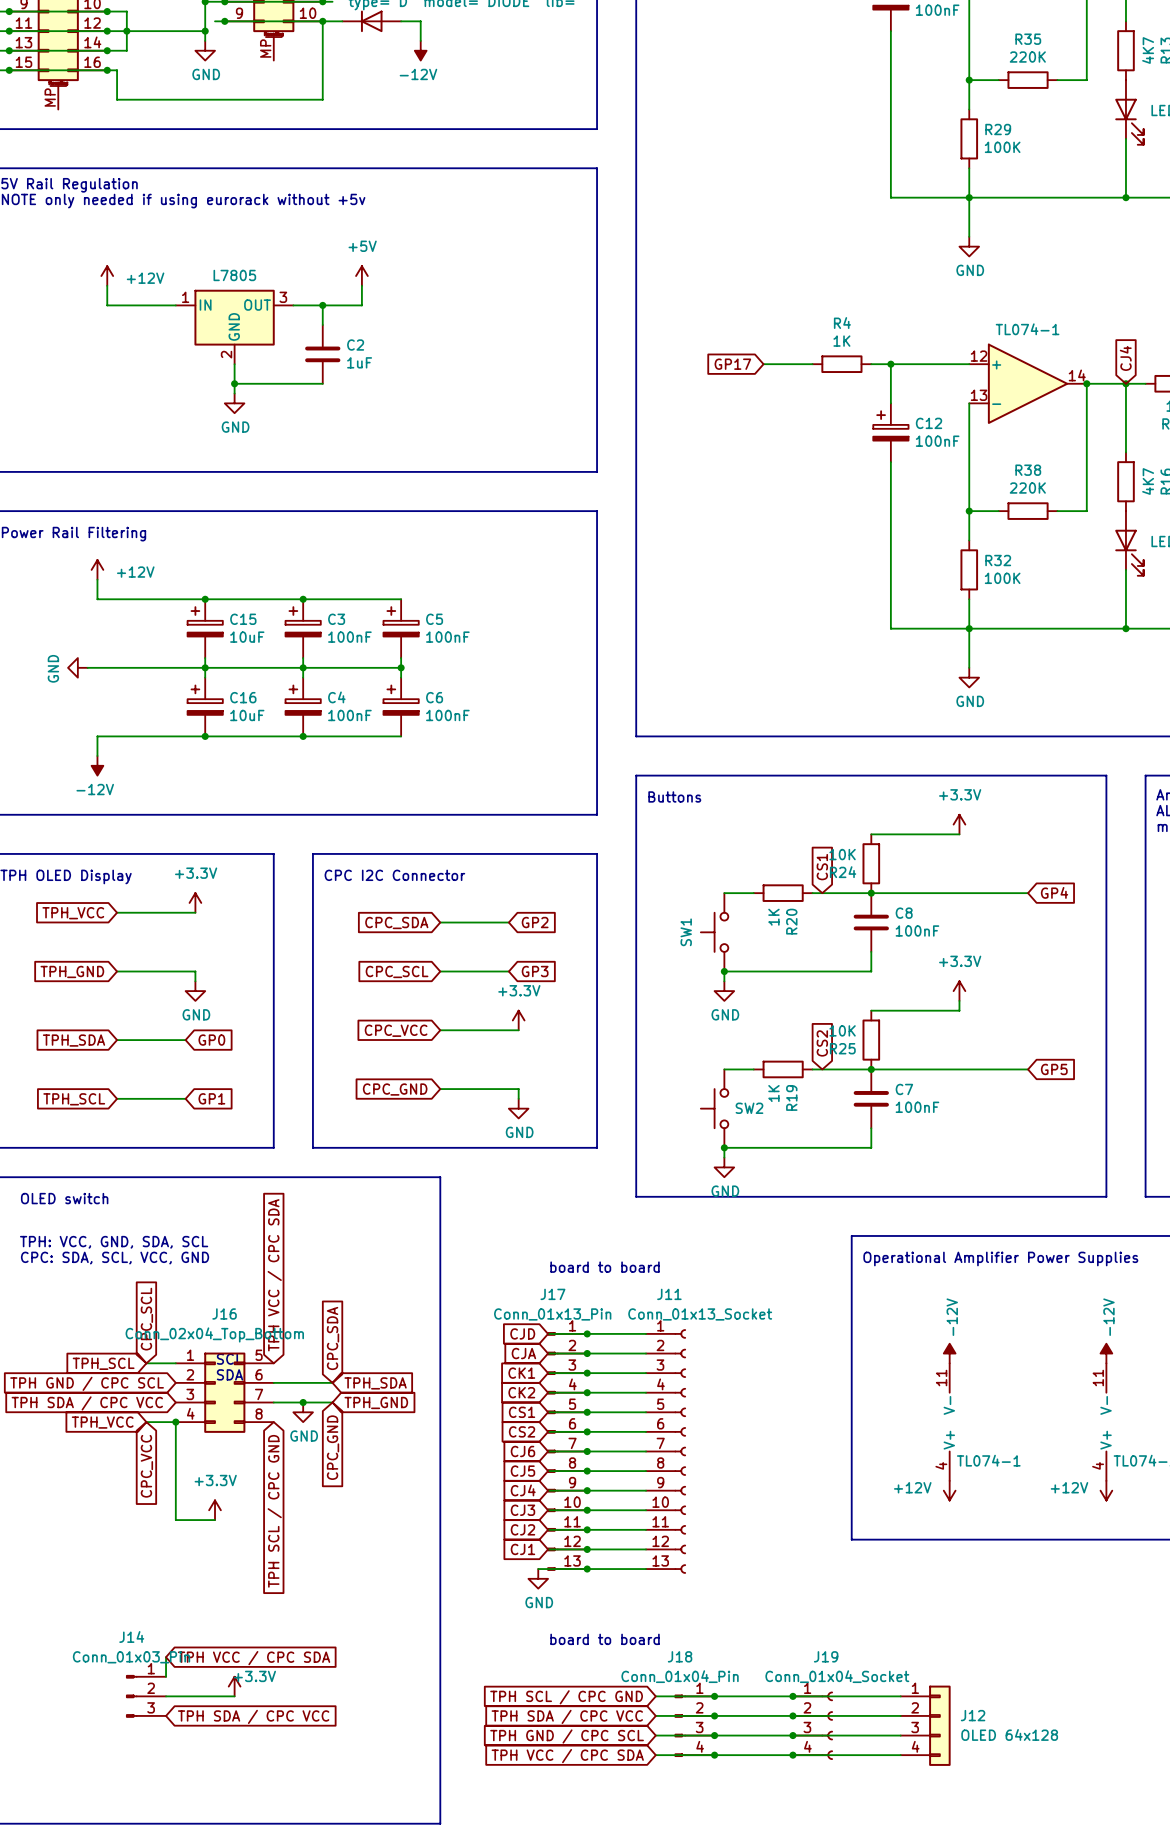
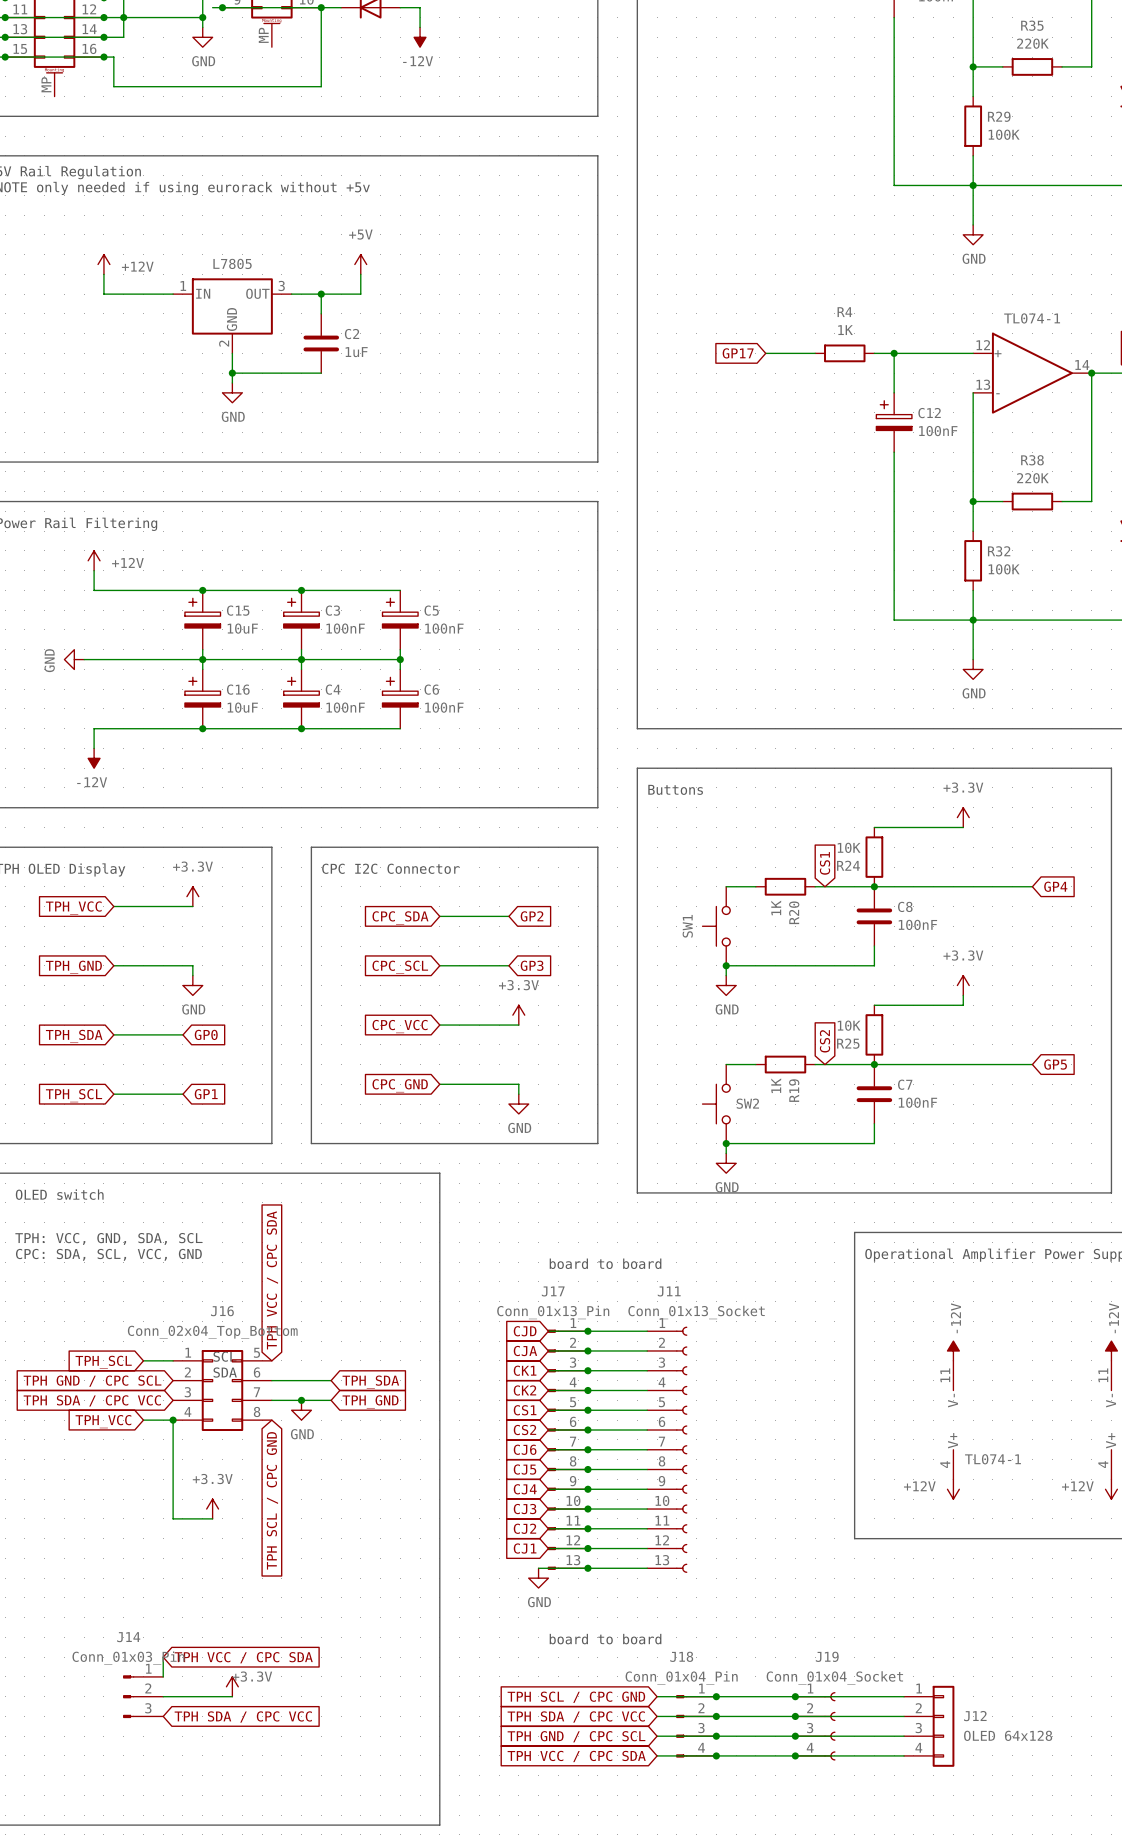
global label: CPC_SCL (146, 1319) -> none
global label: CPC_SDA (333, 1338) -> none
global label: CPC_GND (333, 1447) -> none
global label: CPC_VCC (146, 1466) -> none

